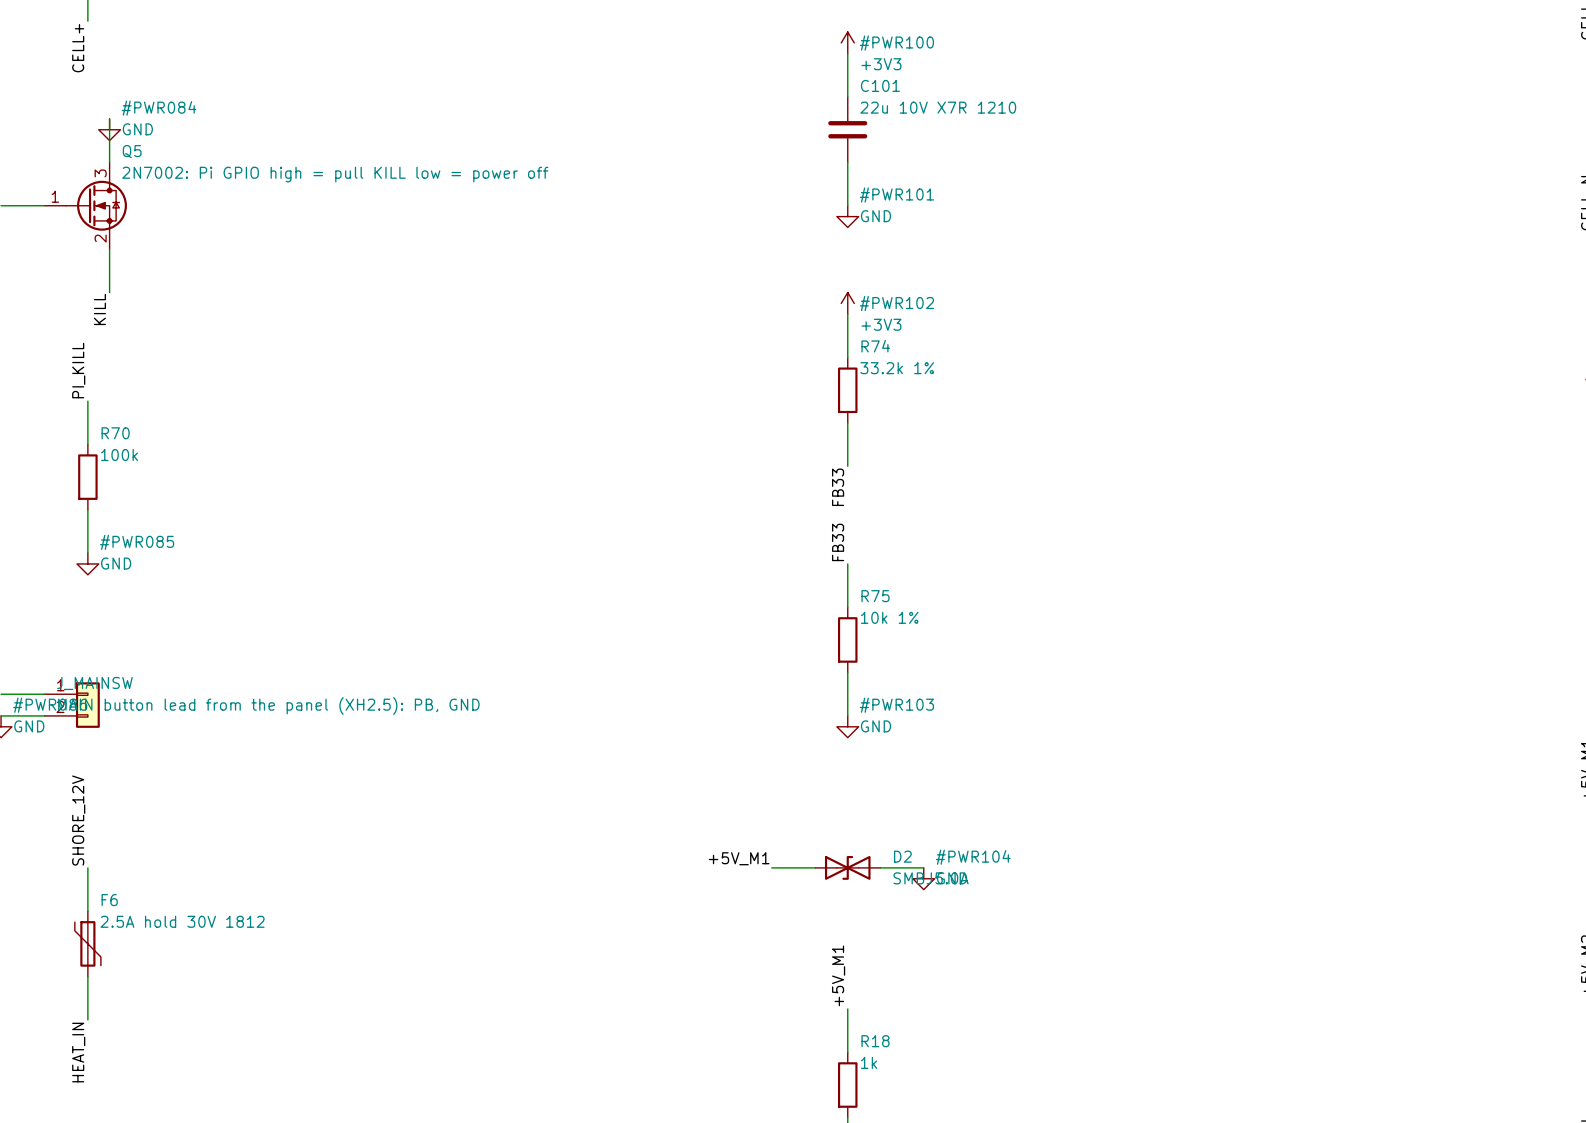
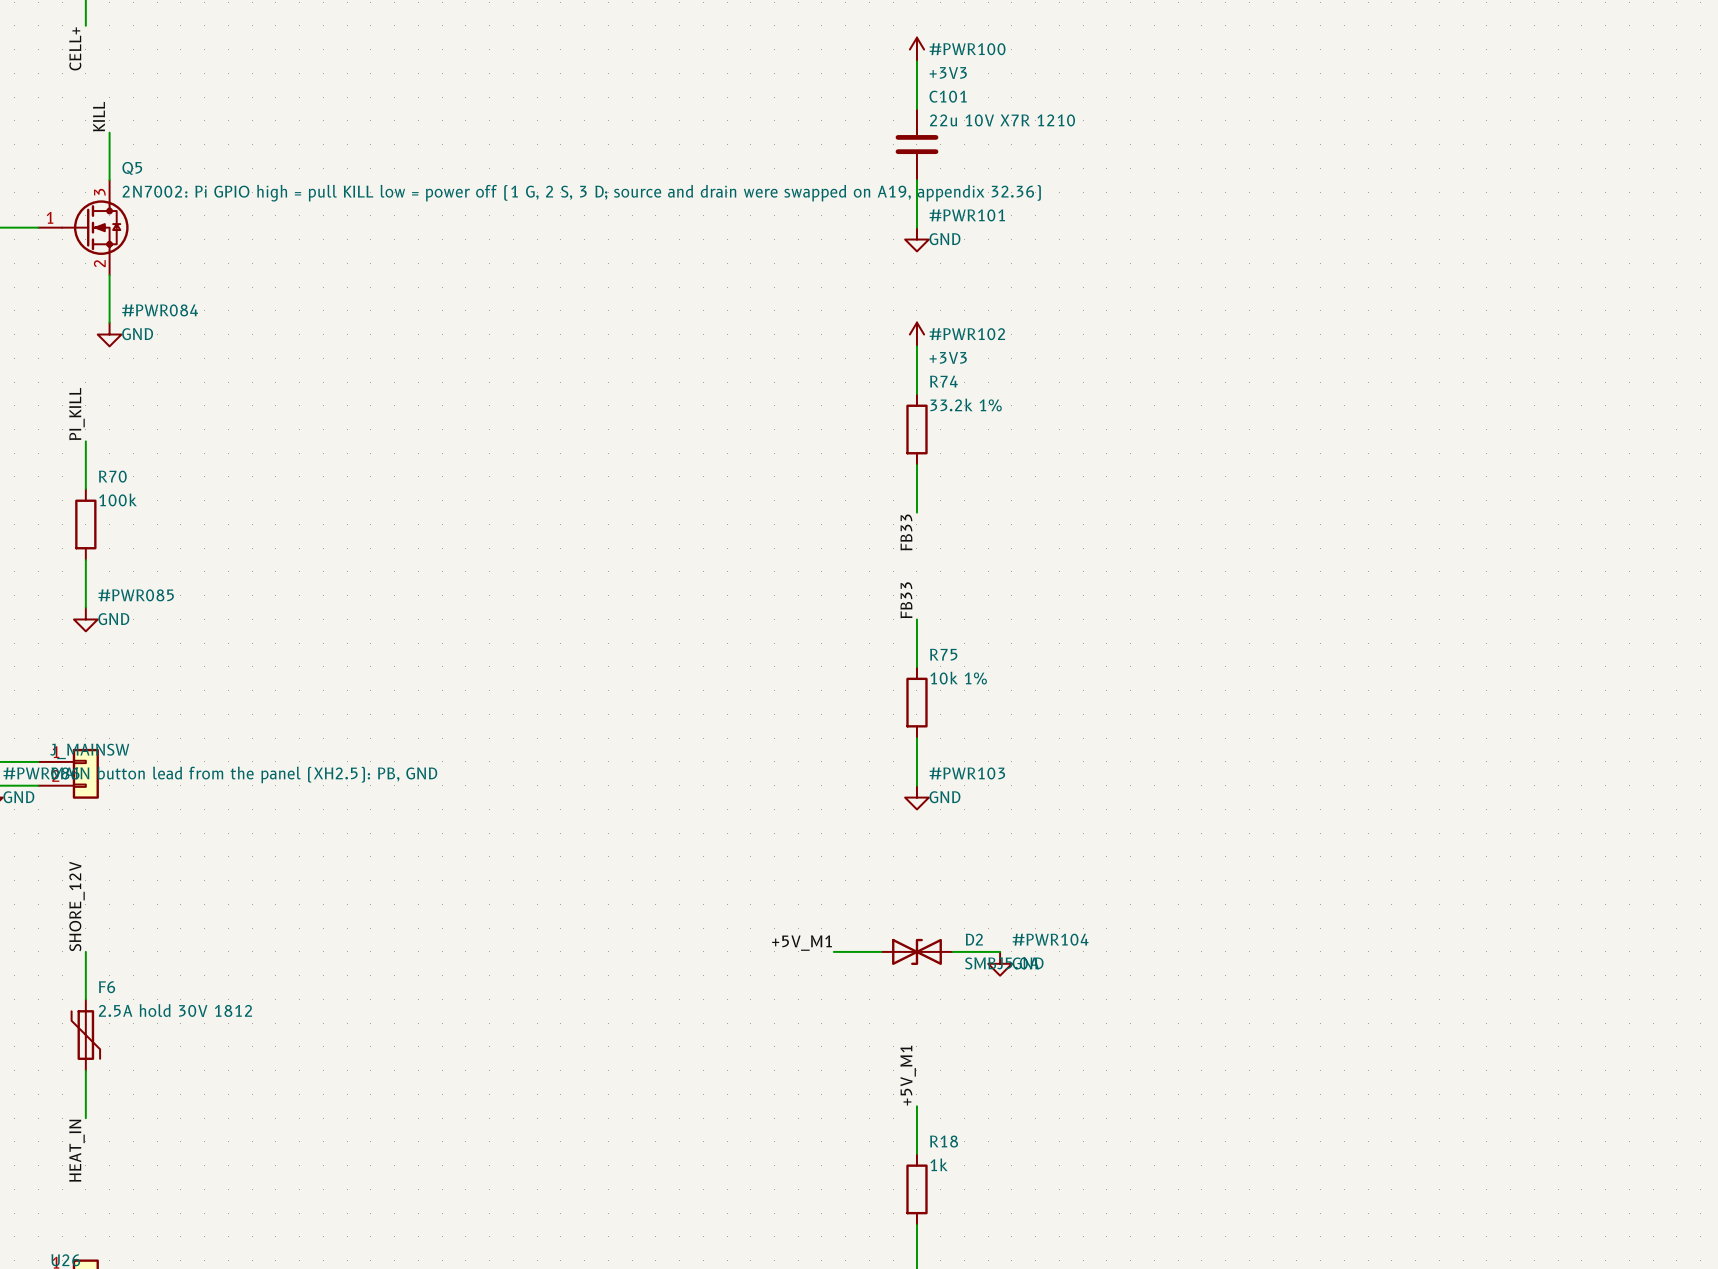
#PWR084 position: GND (109, 129) -> GND (109, 334)
Q5 value: 2N7002: Pi GPIO high = pull KILL low = power off (335, 174) -> 2N7002: Pi GPIO high = pull KILL low = power off (1 G, 2 S, 3 D; source and drain were swapped on A19, appendix 32.36) (581, 193)
label position: KILL (99, 309) -> KILL (98, 116)

